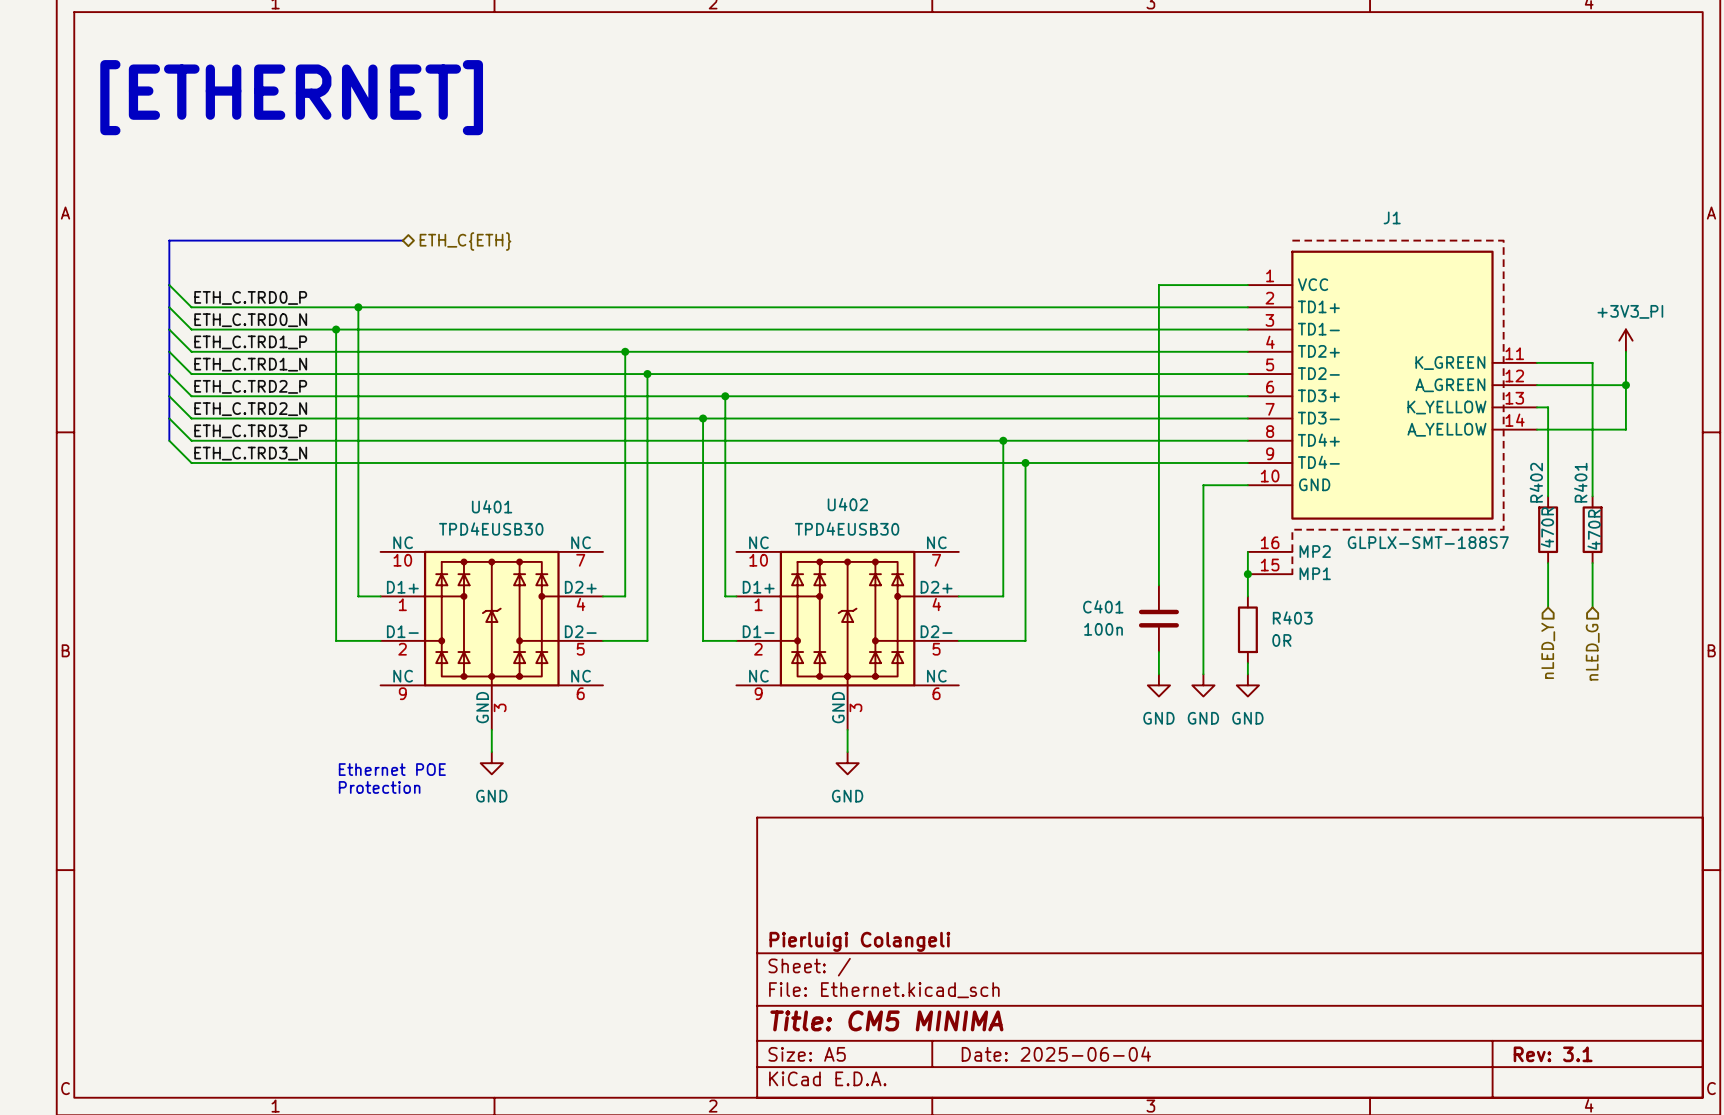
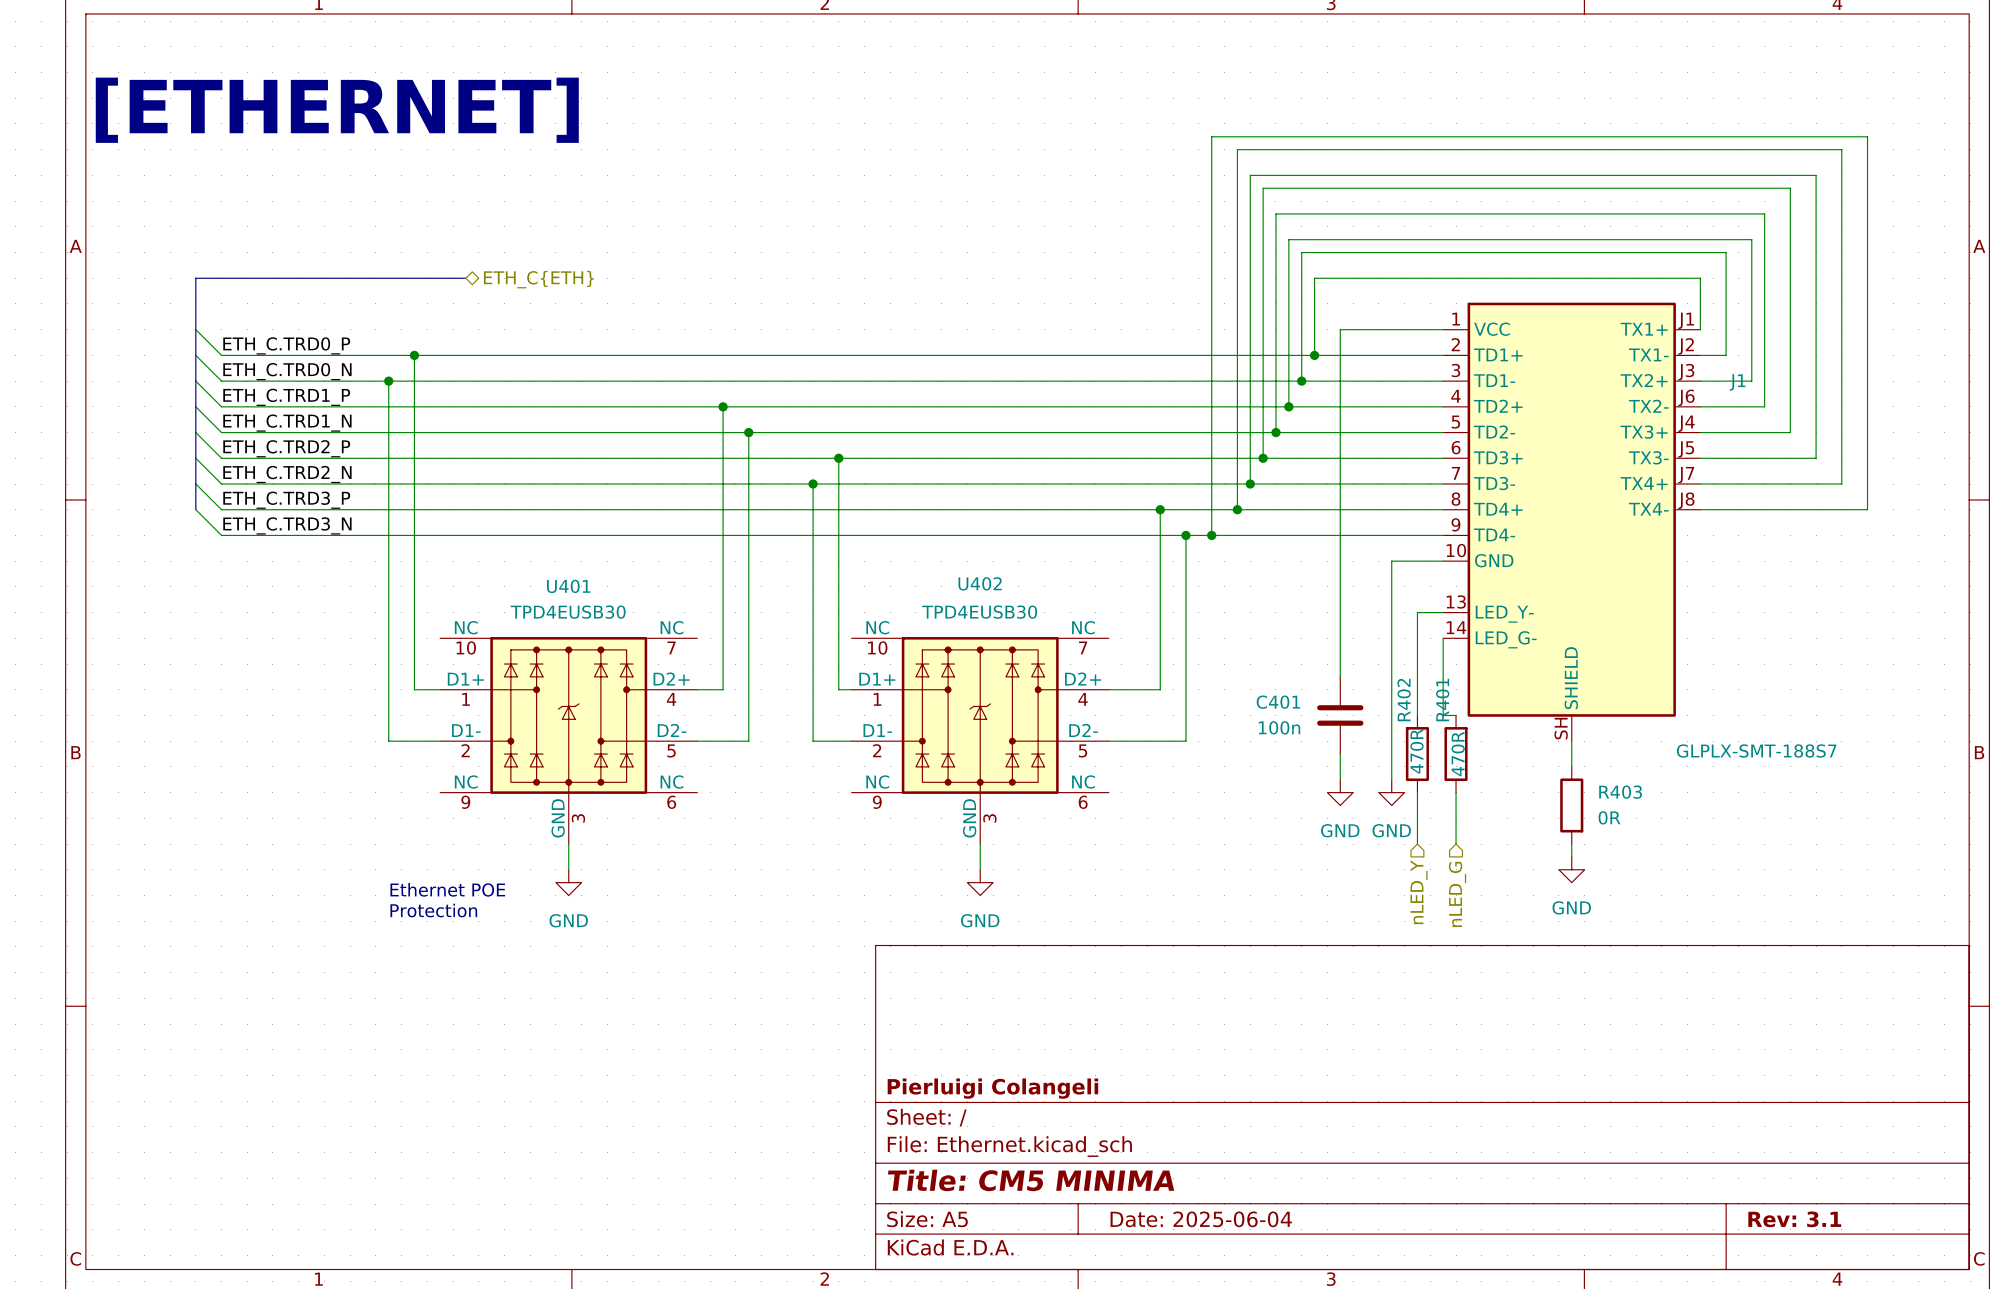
J1 name position: J1 (1392, 217) -> J1 (1737, 382)
J1 symbol: [1247, 240, 1537, 575] -> [1443, 302, 1701, 742]
wire: none -> (1700, 329) (1700, 278) (1314, 278) (1314, 355)
junction: none -> (1314, 355)
wire: none -> (1700, 355) (1726, 355) (1726, 252) (1301, 252) (1301, 381)
junction: none -> (1301, 381)
wire: none -> (1700, 381) (1751, 381) (1751, 239) (1288, 239) (1288, 406)
power symbol: +3V3_PI (1625, 340) -> none
junction: none -> (1288, 406)
wire: none -> (1700, 406) (1764, 406) (1764, 213) (1275, 213) (1275, 432)
wire: (1625, 351) (1625, 429) (1536, 429) -> none
wire: (1536, 362) (1592, 362) -> (1237, 509) (1237, 149) (1841, 149) (1841, 419)
junction: none -> (1275, 432)
wire: none -> (1700, 432) (1790, 432) (1790, 188) (1263, 188) (1263, 458)
wire: (1536, 385) (1625, 385) -> none
junction: (1625, 385) -> none
junction: none -> (1263, 458)
wire: none -> (1700, 458) (1816, 458) (1816, 175) (1250, 175) (1250, 484)
wire: (1536, 407) (1548, 407) (1548, 496) -> none
junction: none -> (1250, 484)
wire: (1592, 418) (1592, 496) -> (1841, 484) (1700, 484)
junction: none -> (1237, 509)
wire: none -> (1700, 509) (1867, 509) (1867, 136) (1211, 136) (1211, 535)
junction: none -> (1211, 535)
wire: none -> (1443, 612) (1417, 612) (1417, 715)
R402 position: (1548, 529) -> (1417, 754)
R401 position: (1592, 529) -> (1456, 754)
J1 value position: GLPLX-SMT-188S7 (1428, 542) -> GLPLX-SMT-188S7 (1756, 751)
wire: (1548, 563) (1548, 607) -> none
wire: (1592, 563) (1592, 607) -> none
junction: (1247, 574) -> none
wire: none -> (1443, 689) (1443, 715) (1456, 715)
R403 position: (1247, 629) -> (1571, 805)
wire: none -> (1571, 741) (1571, 766)
hierarchical label: nLED_Y (1548, 650) -> none
hierarchical label: nLED_G (1592, 652) -> none
wire: (1247, 663) (1247, 674) -> (1571, 844) (1571, 856)
wire: none -> (1417, 792) (1417, 844)
power symbol position: GND (1247, 685) -> GND (1571, 869)
wire: none -> (1456, 792) (1456, 844)
hierarchical label: none -> nLED_Y (1419, 892)
hierarchical label: none -> nLED_G (1457, 894)

